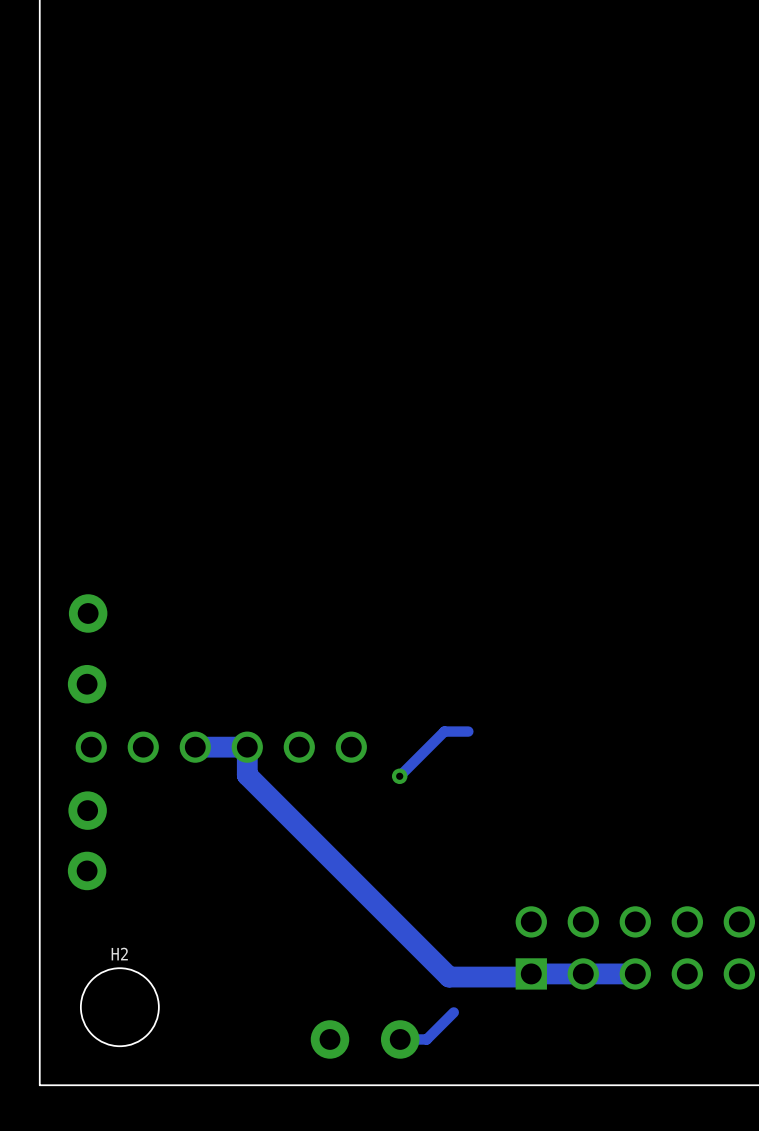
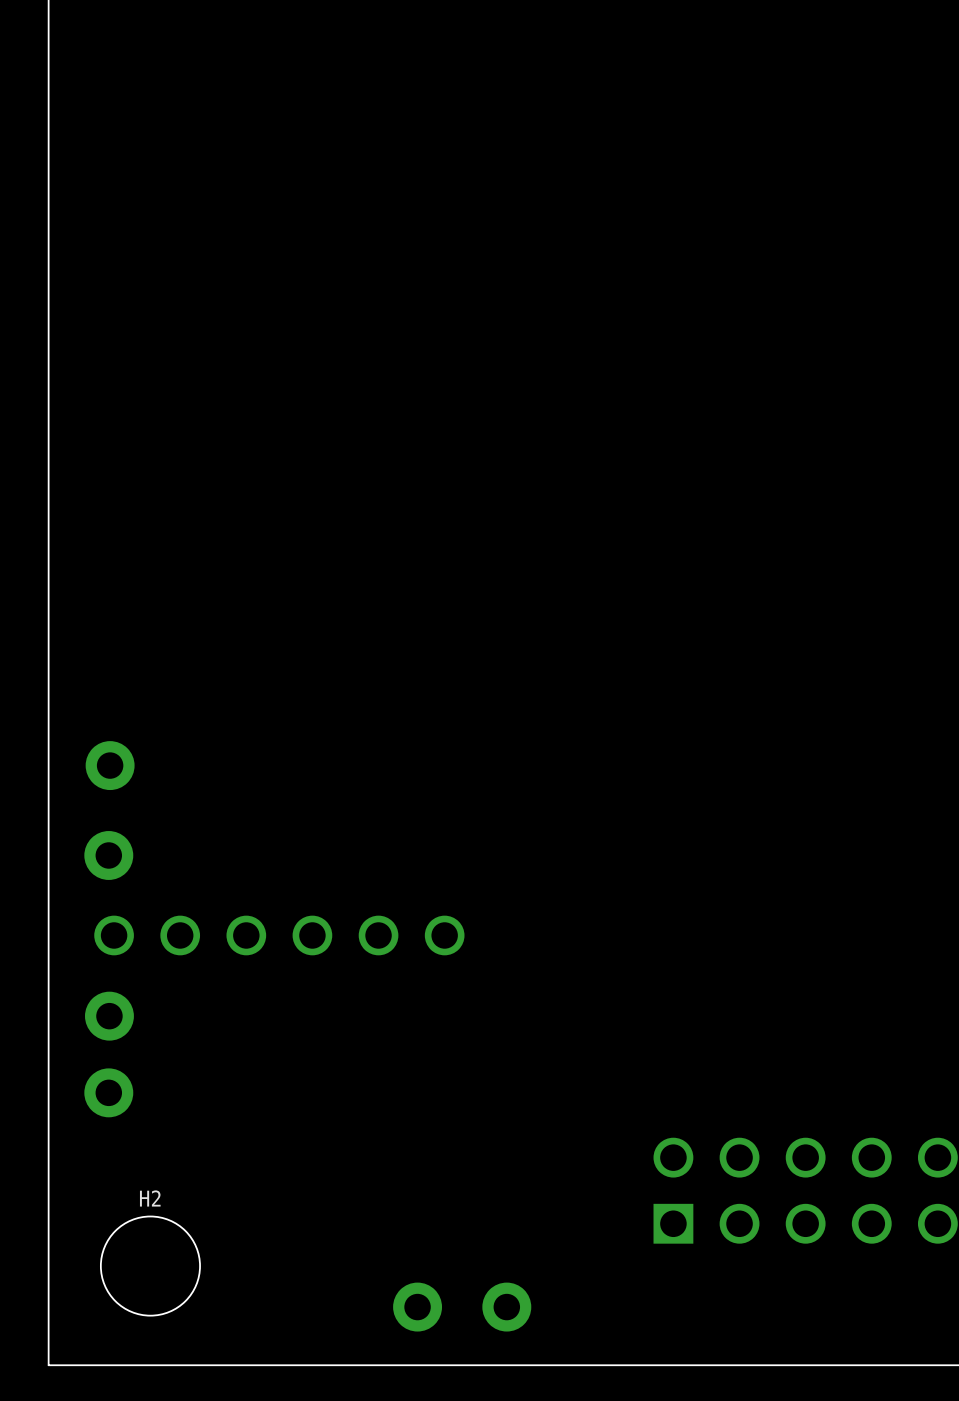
track: (468, 731) (444, 731) (399, 776) -> none
track: (195, 747) (247, 747) (247, 775) (449, 977) (528, 977) (531, 973) (635, 973) -> none
via: (399, 776) -> none
track: (453, 1012) (426, 1039) (400, 1039) -> none

